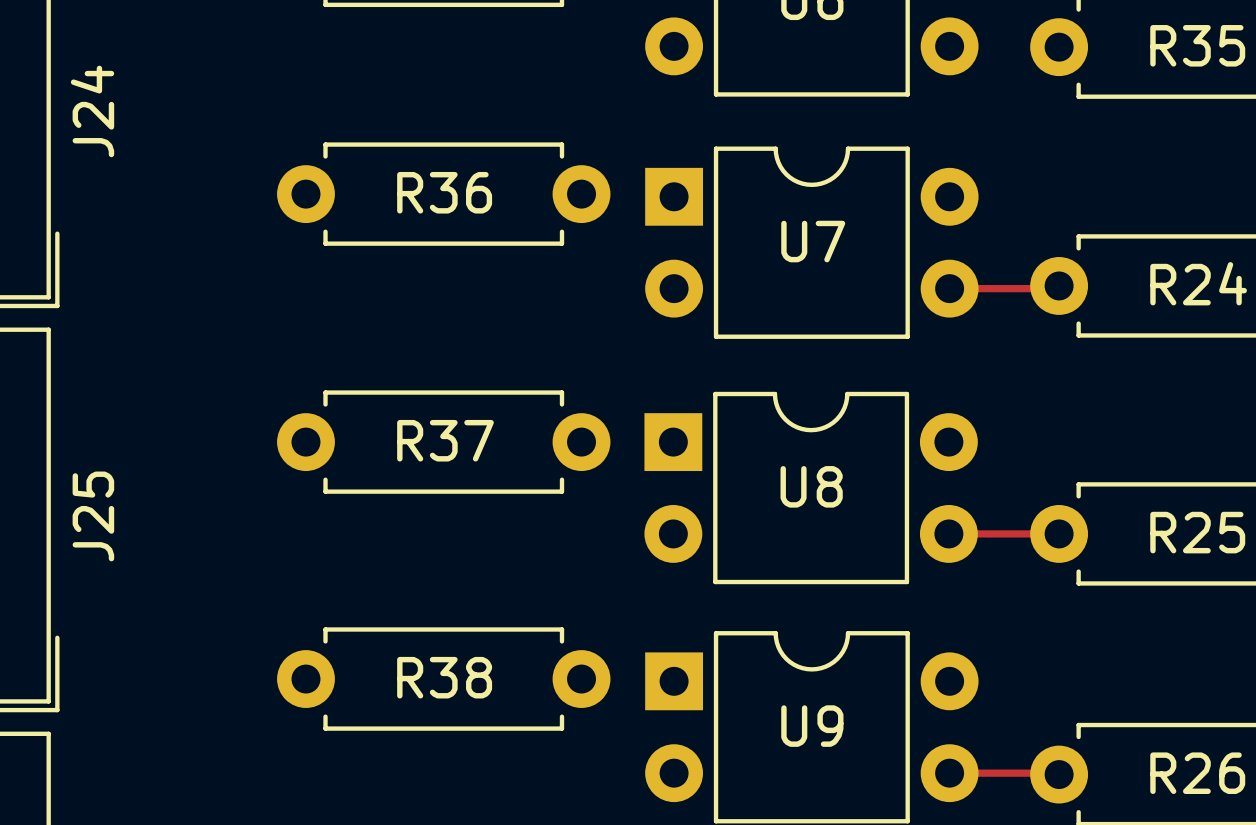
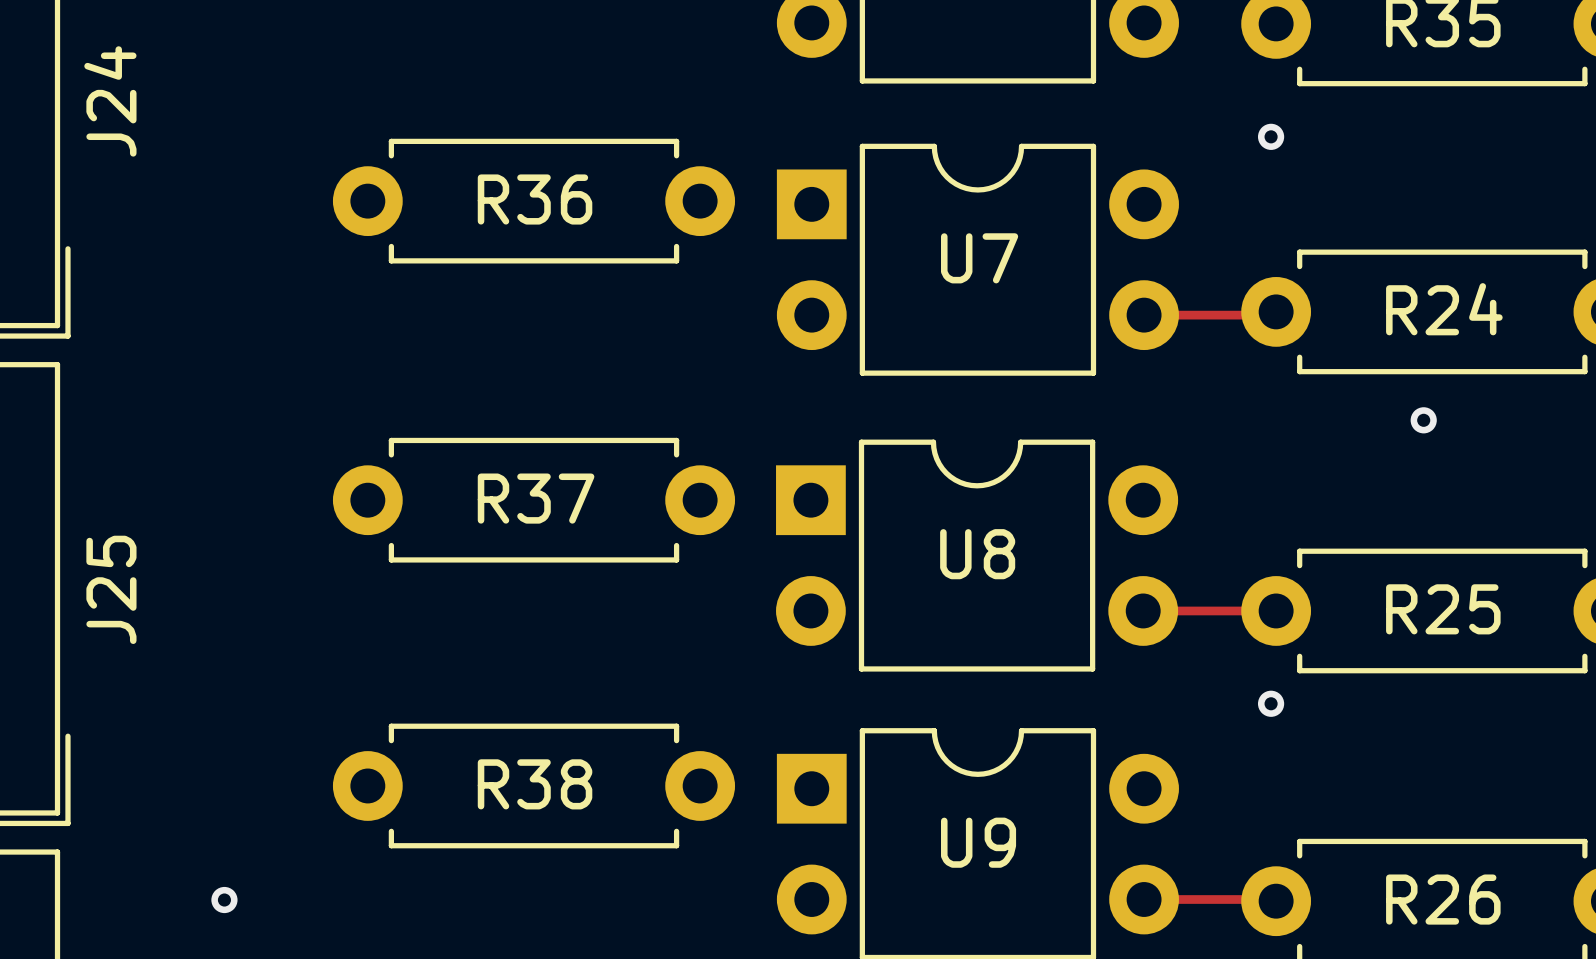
via: none -> (1271, 136)
via: none -> (1423, 420)
via: none -> (1271, 703)
via: none -> (224, 900)

